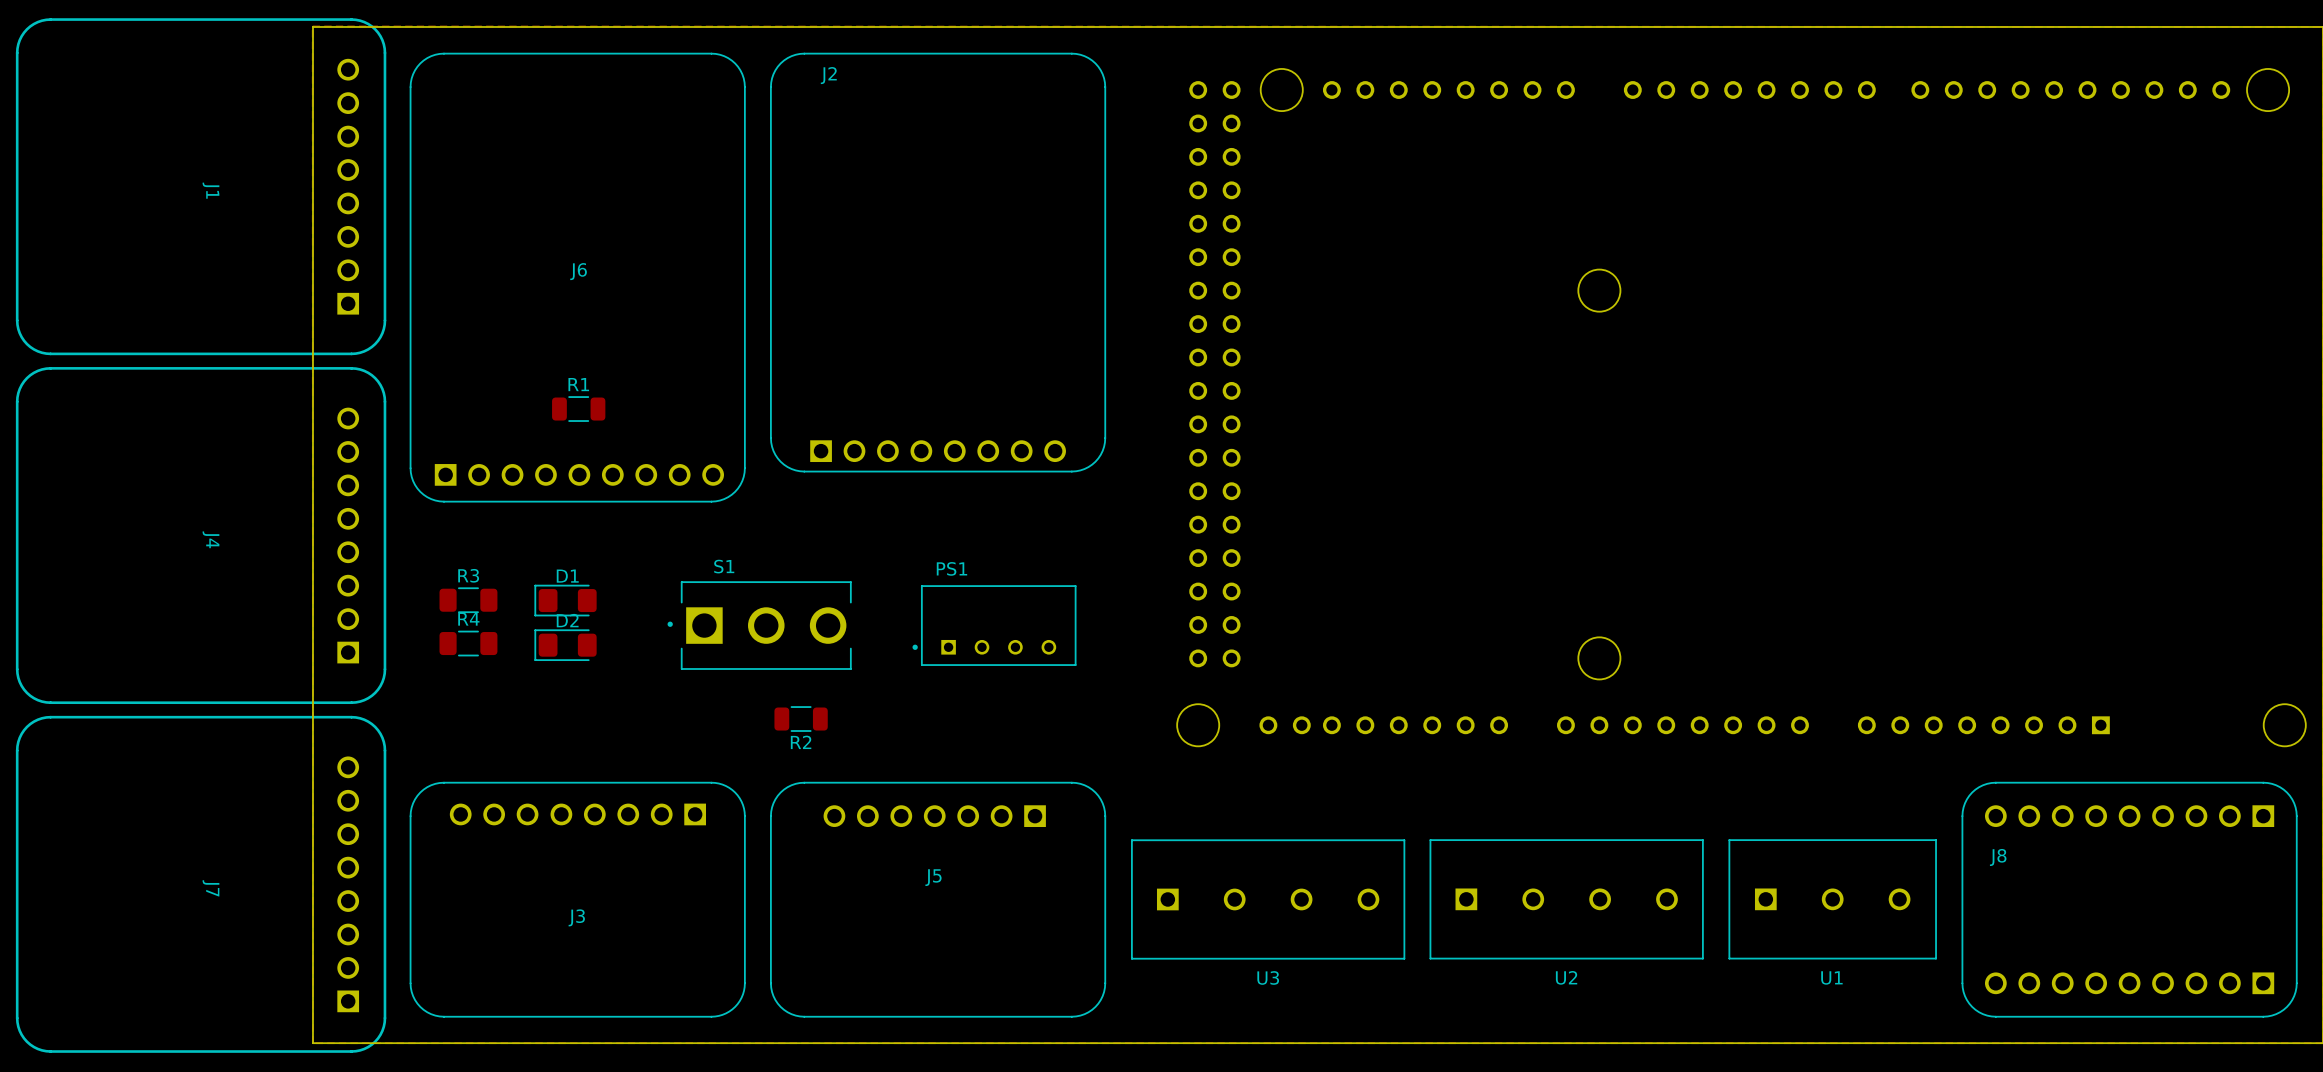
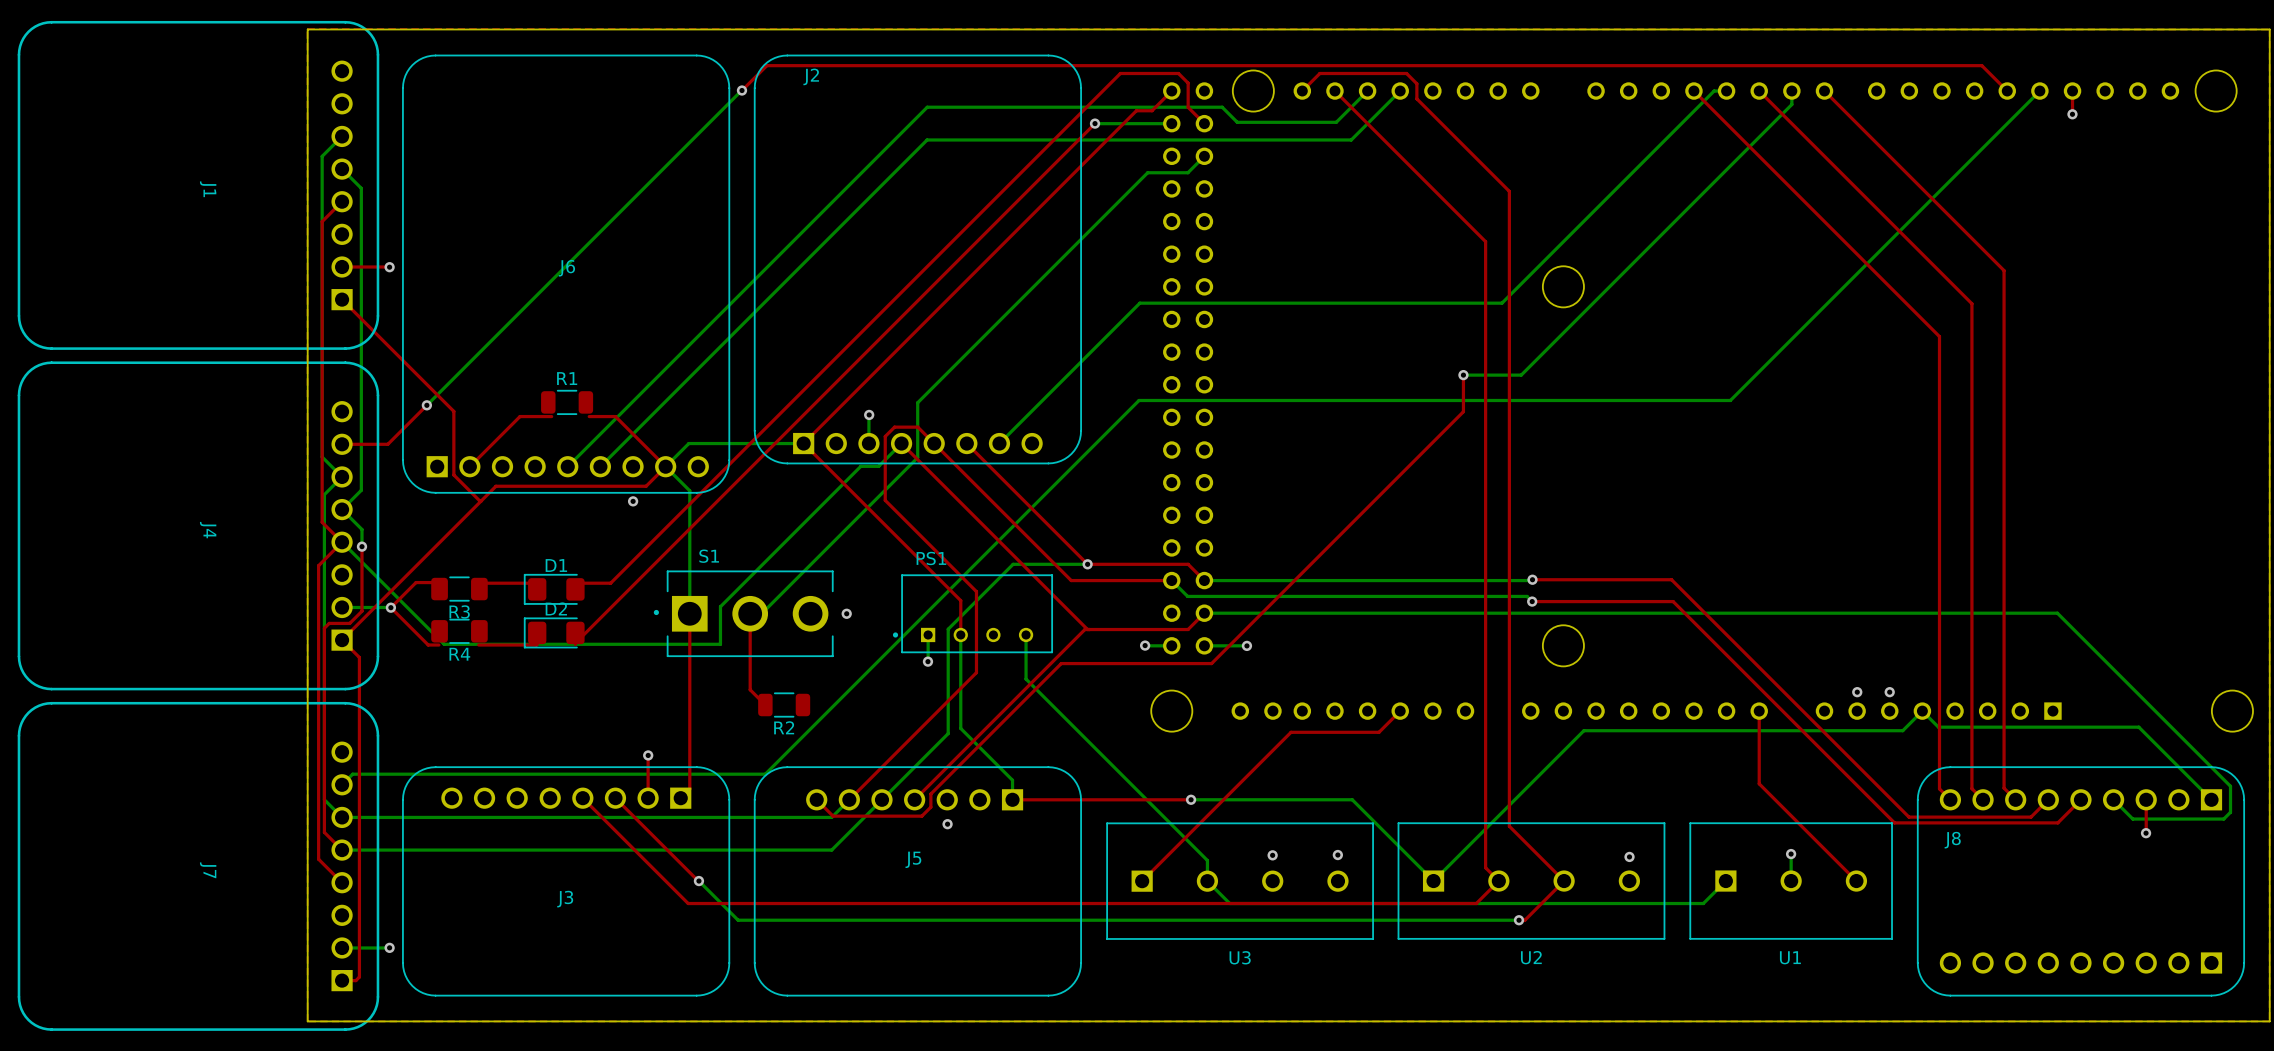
top track: none -> (741, 90) (766, 65) (1981, 65) (2007, 91)
bottom track: none -> (741, 90) (426, 405)
via: none -> (741, 90)
top track: none -> (1171, 91) (1152, 110) (1136, 110) (803, 443) (960, 600) (960, 634)
top track: none -> (1302, 91) (1319, 73) (1406, 73) (1416, 83) (1416, 98) (1509, 191) (1509, 826) (1564, 881) (1524, 920) (1519, 920)
top track: none -> (1334, 91) (1485, 241) (1485, 867) (1498, 881) (1476, 903) (688, 903) (582, 798)
bottom track: none -> (1367, 91) (1336, 122) (1237, 122) (1222, 107) (927, 107) (567, 466)
bottom track: none -> (1400, 91) (1351, 139) (927, 139) (600, 466)
top track: none -> (1693, 91) (1939, 336) (1939, 788) (1950, 799)
bottom track: none -> (1726, 91) (1714, 91) (1501, 303) (1139, 303) (999, 443)
top track: none -> (1759, 91) (1971, 303) (1971, 788) (1983, 799)
bottom track: none -> (1791, 91) (1791, 104) (1521, 375) (1463, 375)
top track: none -> (1824, 91) (2004, 270) (2004, 788) (2015, 799)
bottom track: none -> (2039, 91) (1730, 400) (1139, 400) (765, 774) (352, 774) (342, 784)
top track: none -> (2072, 91) (2072, 114)
via: none -> (2072, 114)
top track: none -> (1095, 123) (575, 644)
bottom track: none -> (1095, 123) (1171, 123)
via: none -> (1095, 123)
top track: none -> (1204, 123) (1188, 107) (1188, 83) (1178, 73) (1120, 73) (610, 583) (575, 583)
bottom track: none -> (342, 136) (322, 156) (322, 457) (342, 476) (324, 494) (324, 799) (342, 817) (831, 817) (849, 799)
bottom track: none -> (1204, 156) (1187, 172) (1147, 172) (917, 402) (917, 457) (761, 613) (750, 613)
bottom track: none -> (342, 169) (361, 188) (361, 490) (342, 509) (361, 529) (361, 546)
top track: none -> (342, 201) (322, 221) (322, 522) (342, 542) (318, 565) (318, 859) (342, 882)
top track: none -> (342, 266) (389, 267)
via: none -> (389, 267)
top track: none -> (342, 299) (453, 411) (453, 475) (481, 501)
top track: none -> (1463, 375) (1463, 411) (1211, 663) (1061, 663) (930, 793) (930, 807) (921, 816) (833, 816) (816, 799)
via: none -> (1463, 375)
top track: none -> (426, 405) (387, 444) (342, 444)
via: none -> (426, 405)
bottom track: none -> (869, 414) (868, 443)
via: none -> (869, 414)
top track: none -> (551, 416) (520, 416) (469, 466)
top track: none -> (589, 416) (615, 416) (665, 466) (646, 486) (495, 486) (342, 640) (359, 657) (359, 977) (355, 980) (342, 980)
bottom track: none -> (803, 443) (688, 443) (665, 466) (689, 490) (689, 613)
top track: none -> (901, 443) (1087, 629)
bottom track: none -> (901, 443) (878, 466) (860, 466) (720, 606) (720, 644) (444, 644) (342, 542)
top track: none -> (966, 443) (1087, 564) (1188, 564) (1204, 580)
via: none -> (633, 501)
top track: none -> (361, 546) (361, 611) (349, 623) (329, 623) (324, 628) (324, 832) (342, 850)
via: none -> (361, 546)
bottom track: none -> (1087, 564) (1013, 564) (948, 629) (948, 733) (831, 850) (342, 850)
via: none -> (1087, 564)
R3 name position: R3 (468, 575) -> R3 (459, 611)
top track: none -> (1532, 579) (1671, 579) (1908, 817) (2031, 817) (2048, 799)
bottom track: none -> (1532, 579) (1204, 580)
via: none -> (1532, 579)
top track: none -> (1171, 580) (1071, 580) (917, 427) (894, 427) (885, 436) (885, 500) (976, 591) (976, 672) (849, 799)
bottom track: none -> (1171, 580) (1187, 596) (1527, 596) (1532, 601)
top track: none -> (438, 582) (416, 582) (390, 607) (428, 645) (438, 645)
top track: none -> (478, 582) (537, 583)
top track: none -> (1532, 601) (1673, 601) (1894, 822) (2057, 822) (2080, 799)
via: none -> (1532, 601)
bottom track: none -> (342, 607) (390, 607)
via: none -> (390, 607)
R4 name position: R4 (468, 619) -> R4 (459, 654)
top track: none -> (1204, 613) (1188, 629) (1084, 629) (914, 799)
bottom track: none -> (1204, 613) (2057, 613) (2230, 786) (2230, 812) (2223, 819) (2132, 819) (2113, 799)
top track: none -> (689, 613) (689, 789) (680, 798)
top track: none -> (750, 613) (750, 689) (765, 705)
via: none -> (846, 613)
bottom track: none -> (928, 634) (928, 661)
bottom track: none -> (960, 634) (960, 728) (1012, 780) (1012, 799)
bottom track: none -> (1026, 634) (1026, 679) (1207, 860) (1207, 881) (1229, 903) (1703, 903) (1725, 881)
top track: none -> (537, 644) (478, 645)
bottom track: none -> (1145, 645) (1171, 645)
via: none -> (1145, 645)
bottom track: none -> (1204, 645) (1246, 645)
via: none -> (1246, 645)
via: none -> (927, 661)
via: none -> (1857, 692)
via: none -> (1889, 692)
top track: none -> (1400, 711) (1379, 732) (1291, 732) (1142, 881)
top track: none -> (1759, 711) (1759, 783) (1856, 881)
top track: none -> (648, 755) (648, 798)
via: none -> (648, 755)
top track: none -> (615, 798) (698, 881)
top track: none -> (1012, 799) (1191, 799)
bottom track: none -> (1191, 799) (1352, 799) (1433, 881) (1583, 730) (1902, 730) (1922, 711) (1938, 727) (2138, 727) (2211, 799)
via: none -> (1191, 799)
top track: none -> (2146, 799) (2146, 833)
via: none -> (947, 824)
via: none -> (2146, 833)
bottom track: none -> (1791, 854) (1791, 881)
via: none -> (1791, 854)
via: none -> (1337, 855)
via: none -> (1272, 855)
via: none -> (1629, 856)
bottom track: none -> (698, 881) (738, 920) (1519, 920)
via: none -> (698, 881)
via: none -> (1519, 920)
bottom track: none -> (342, 947) (389, 947)
via: none -> (389, 947)

